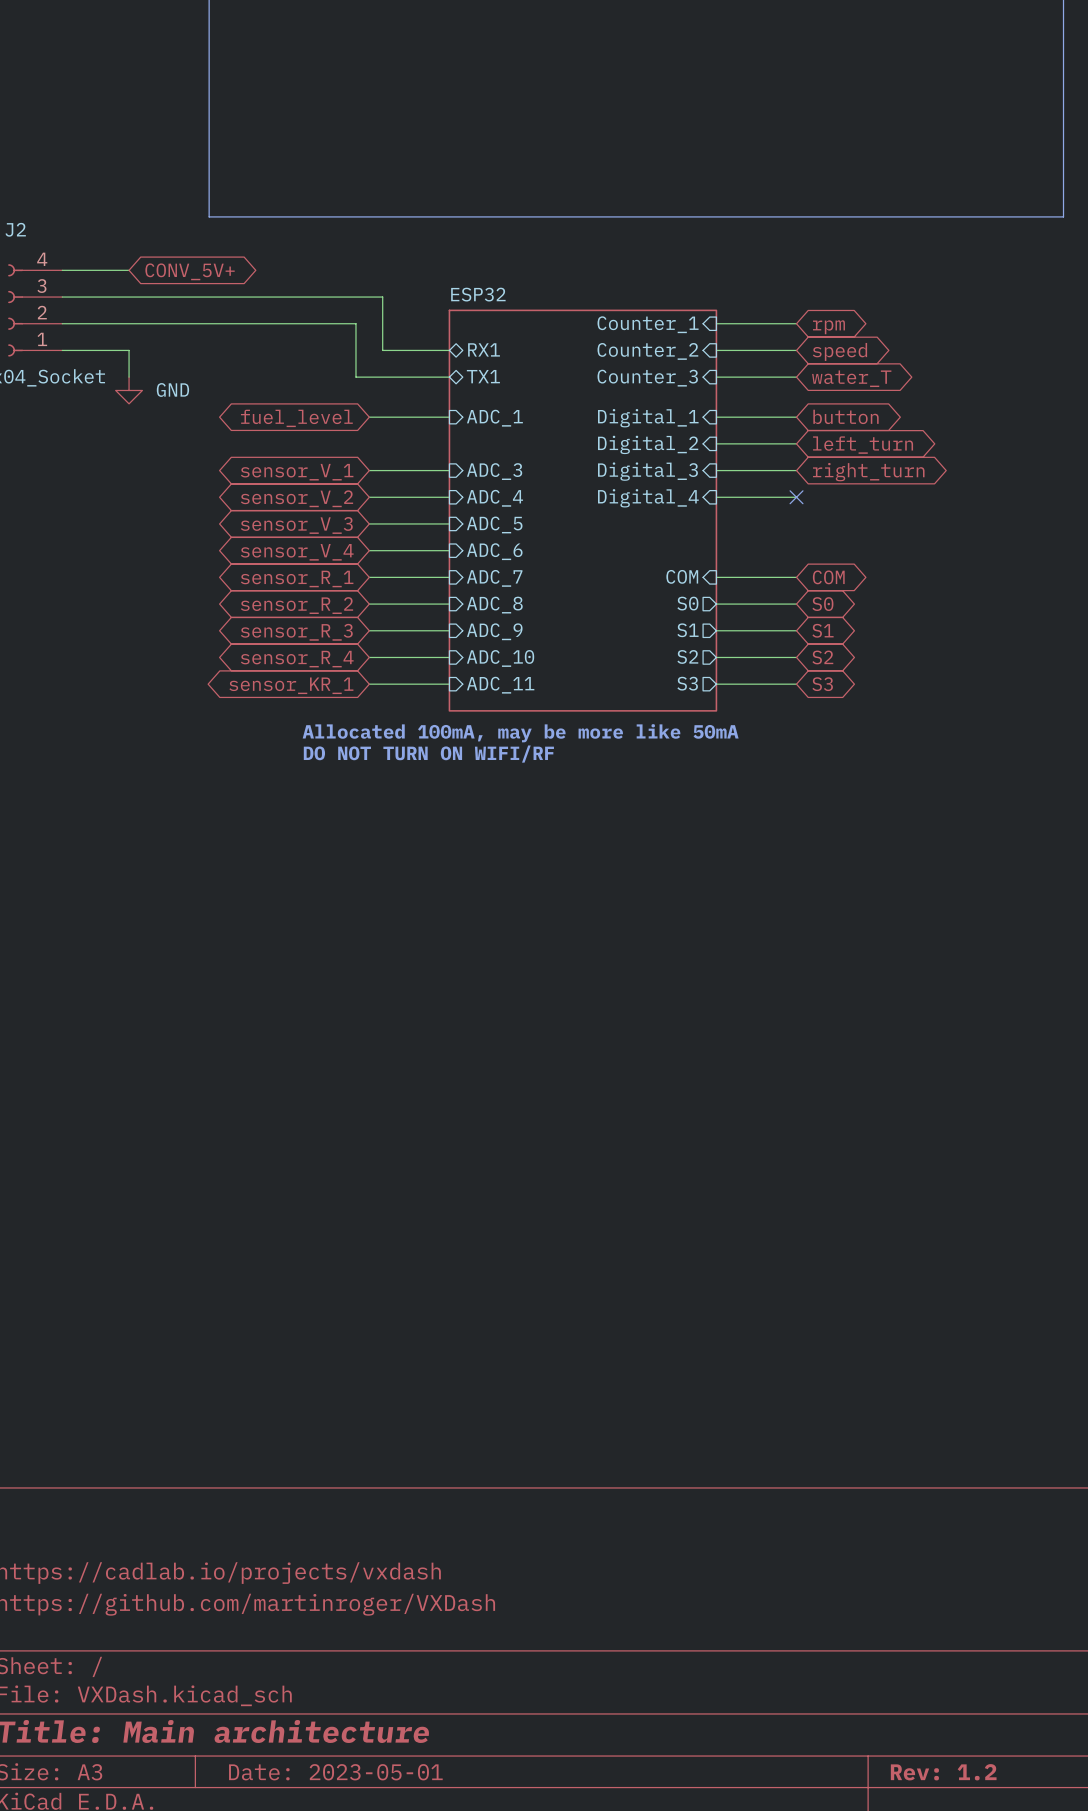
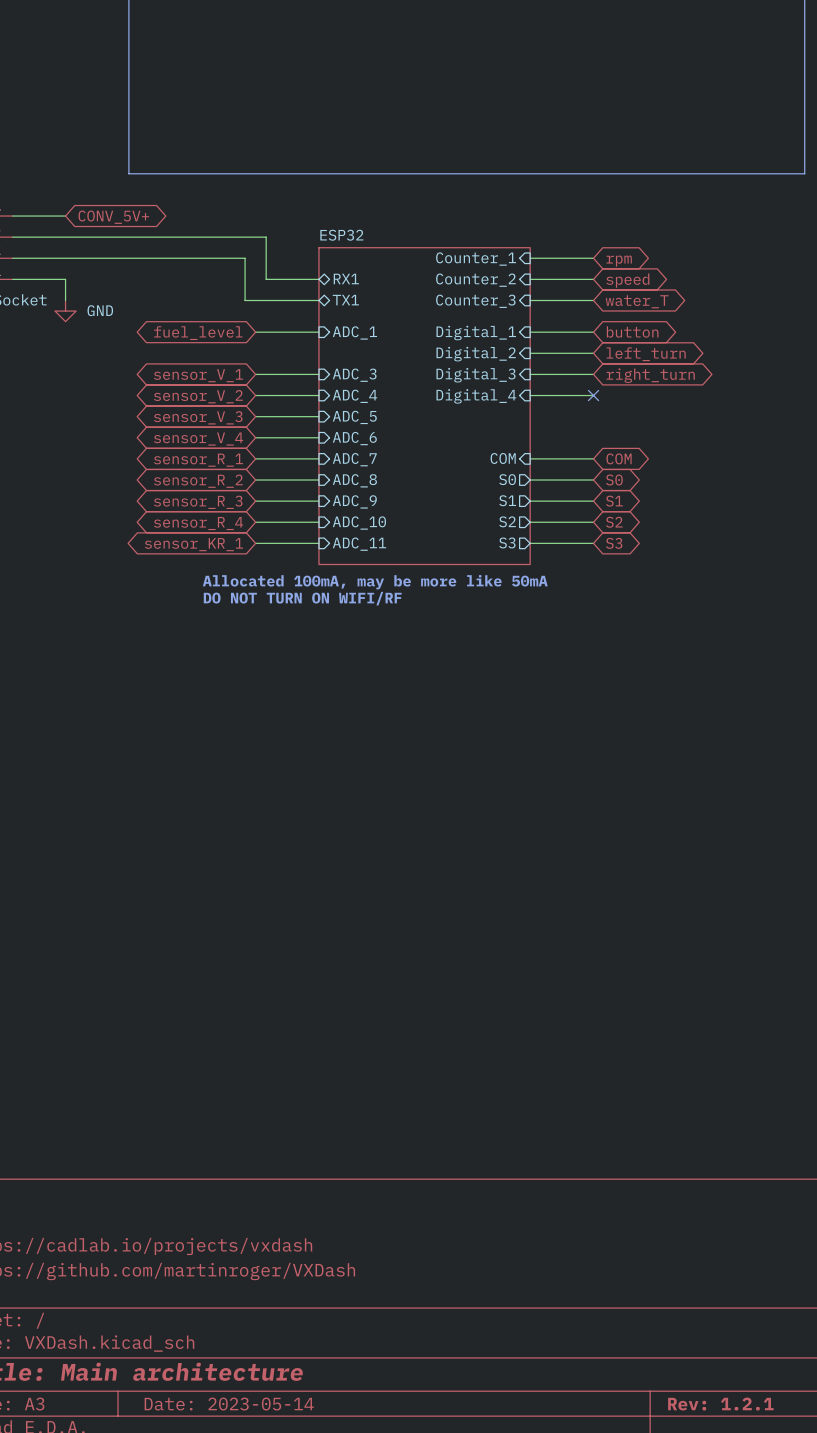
title block: Date: 2023-05-01 (335, 1772) -> Date: 2023-05-14 (229, 1404)
title block: Rev: 1.2 (943, 1772) -> Rev: 1.2.1 (720, 1404)

